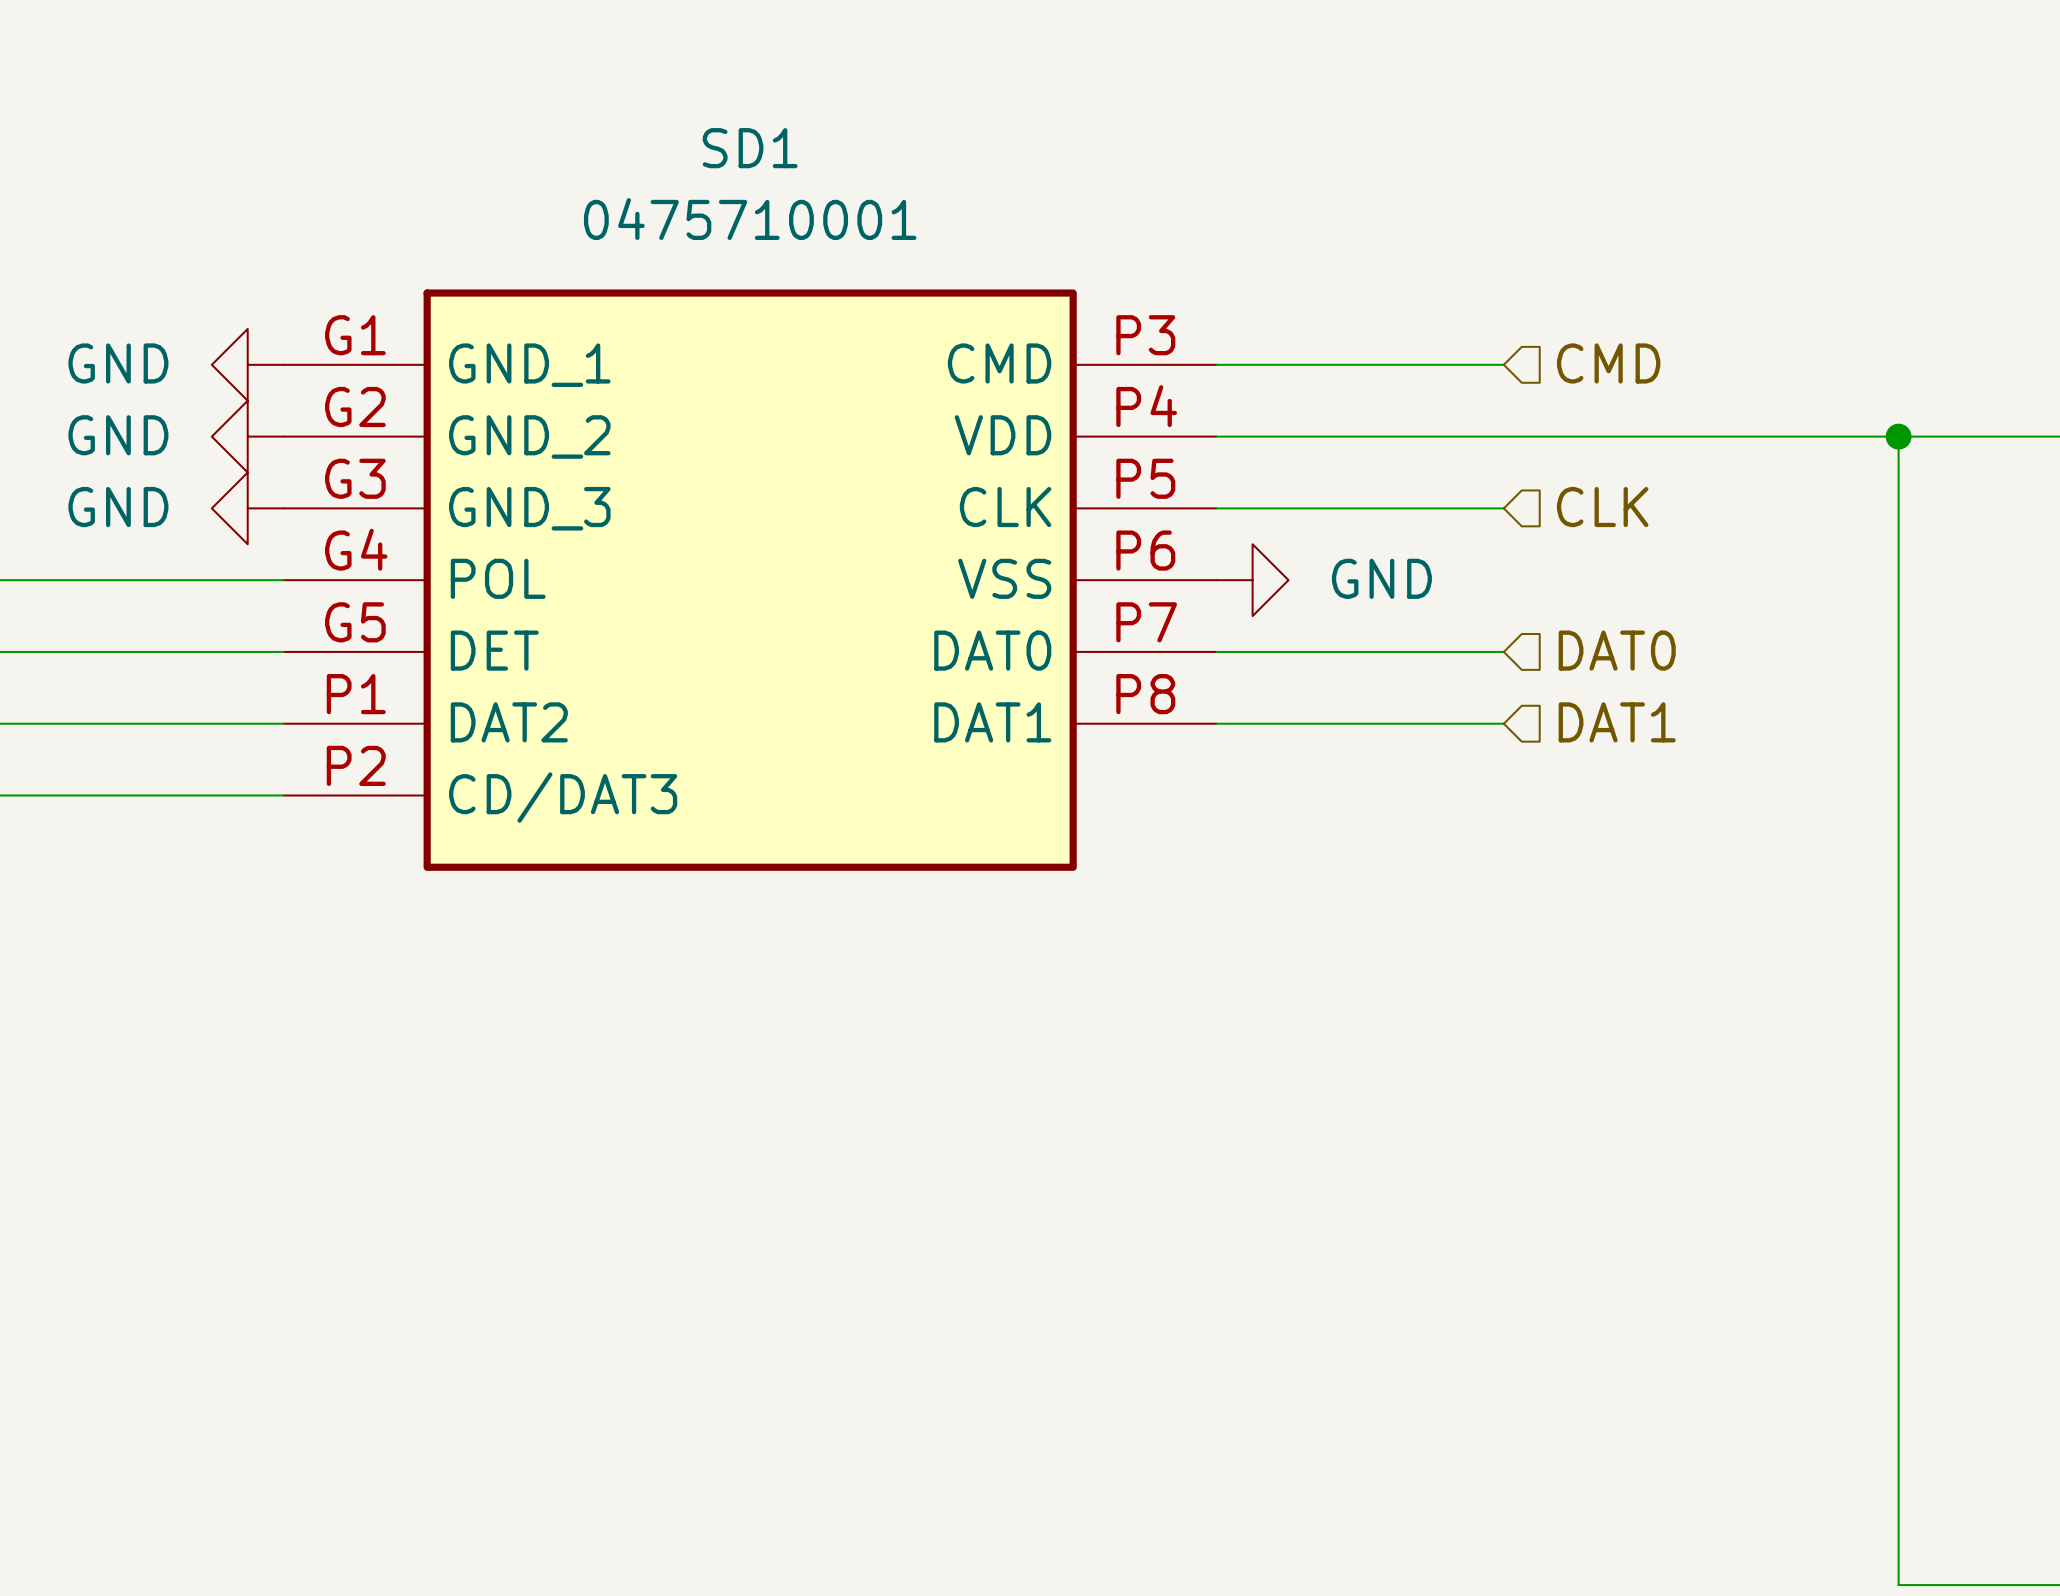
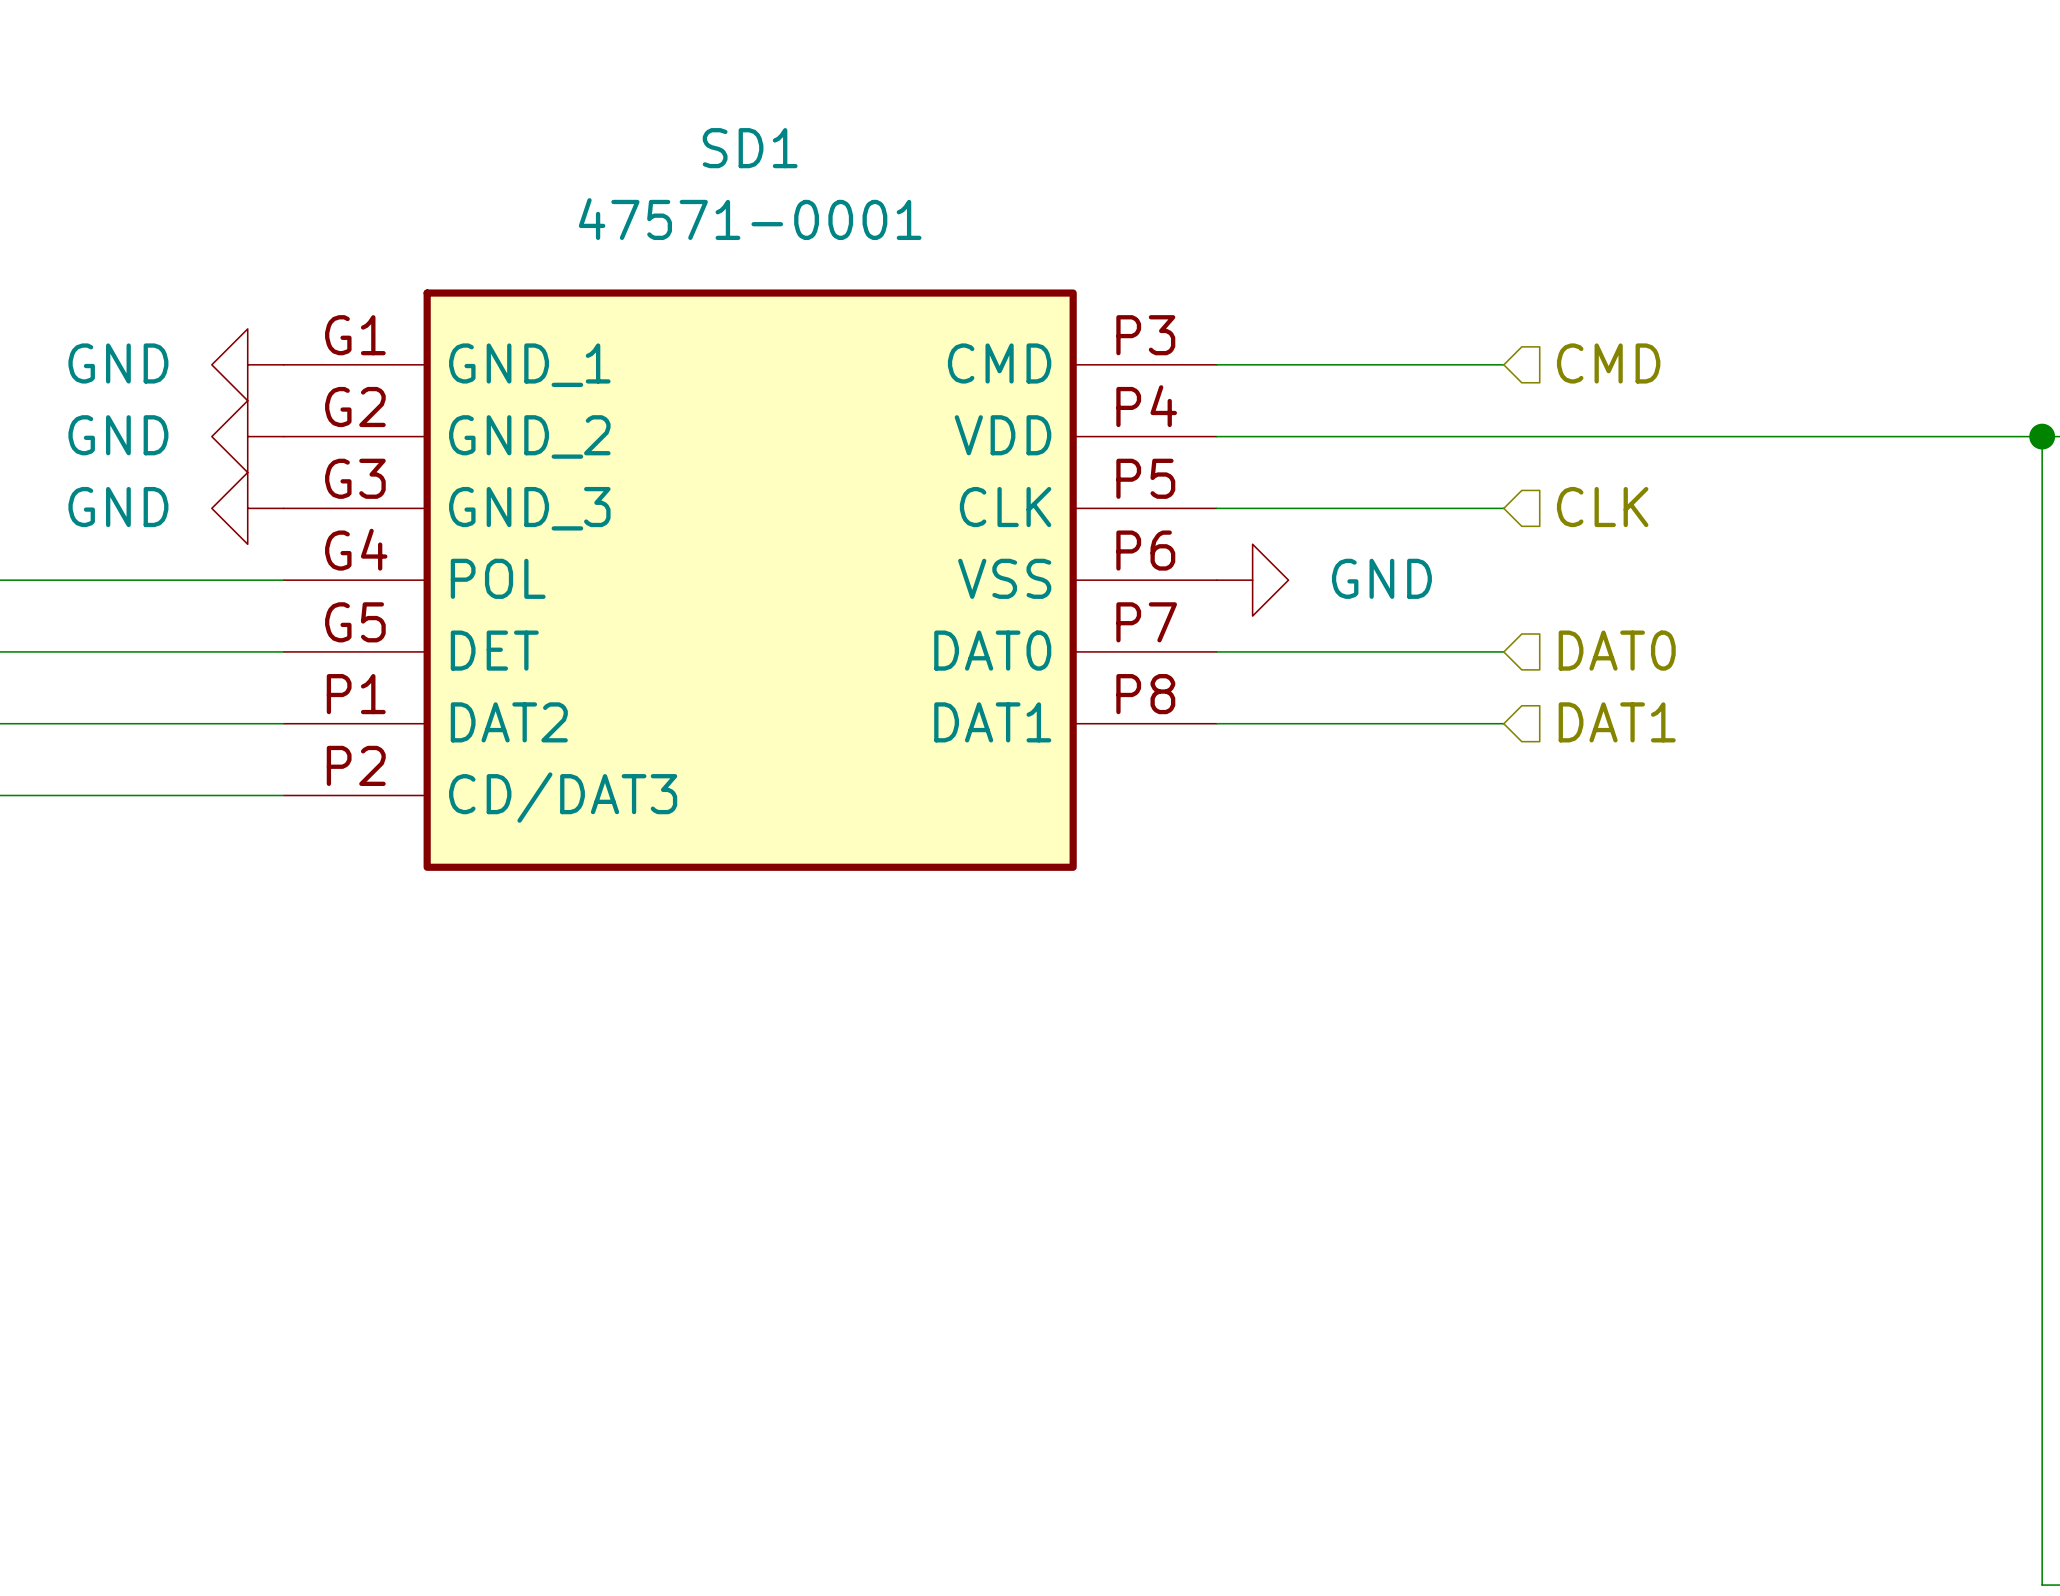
SD1 value: 0475710001 (750, 219) -> 47571-0001 (750, 219)
wire: (1898, 436) (1898, 1585) (2042, 1585) -> (2042, 436) (2042, 1585)
junction position: (1898, 436) -> (2042, 436)

